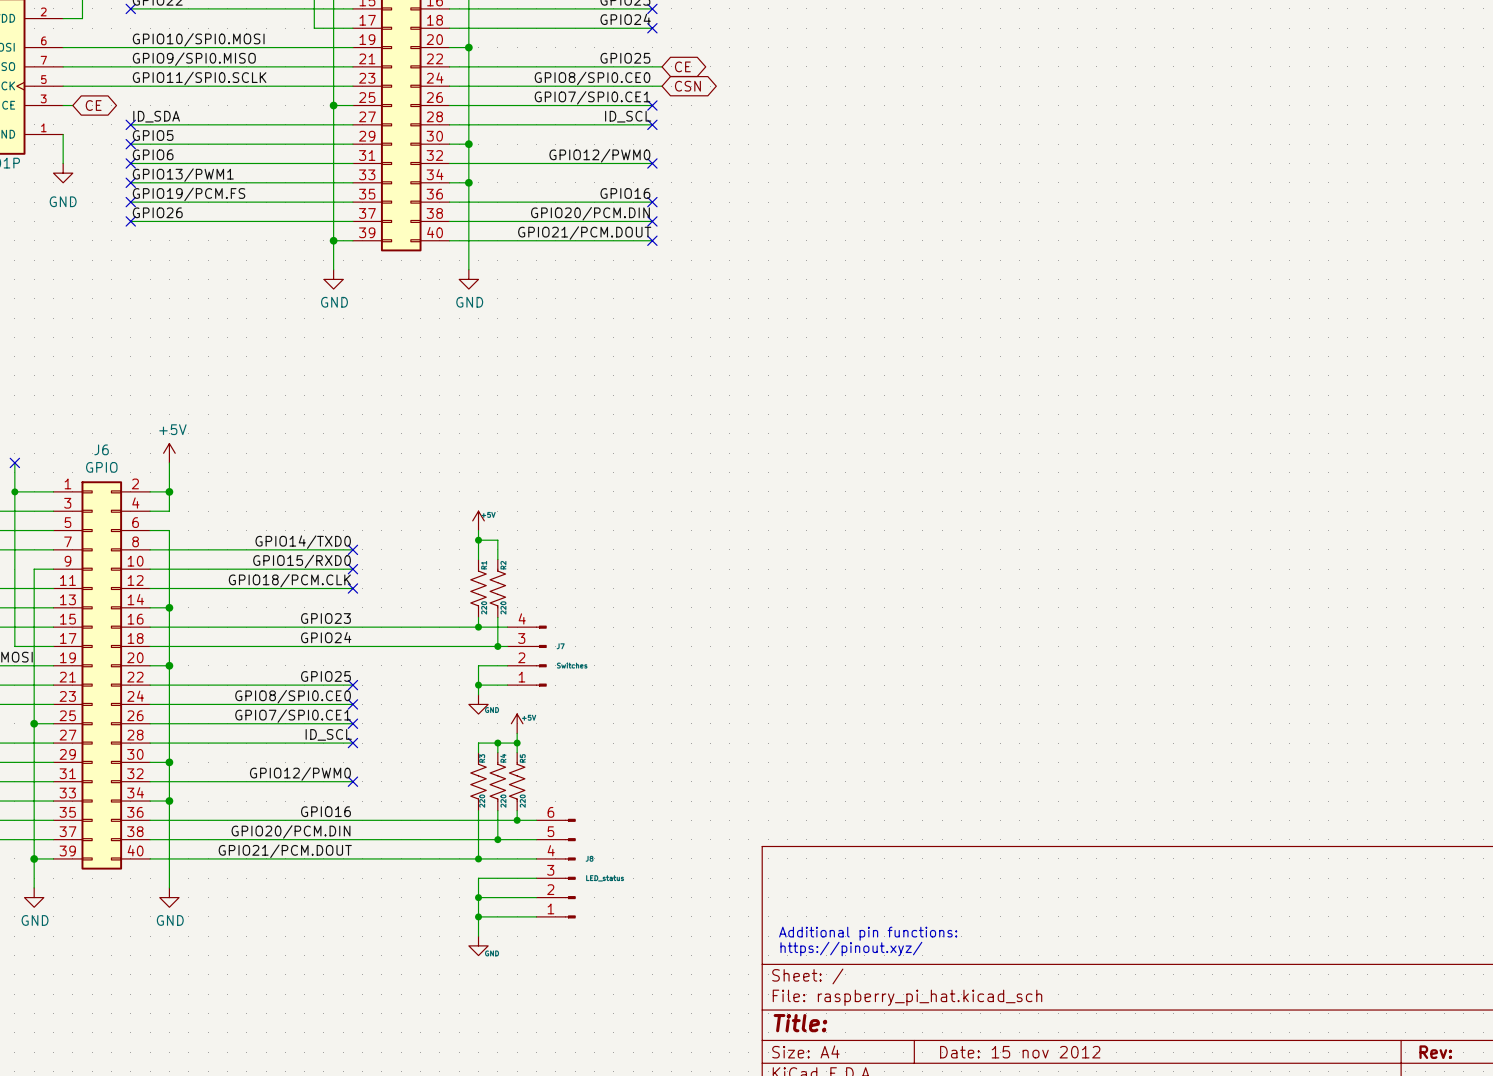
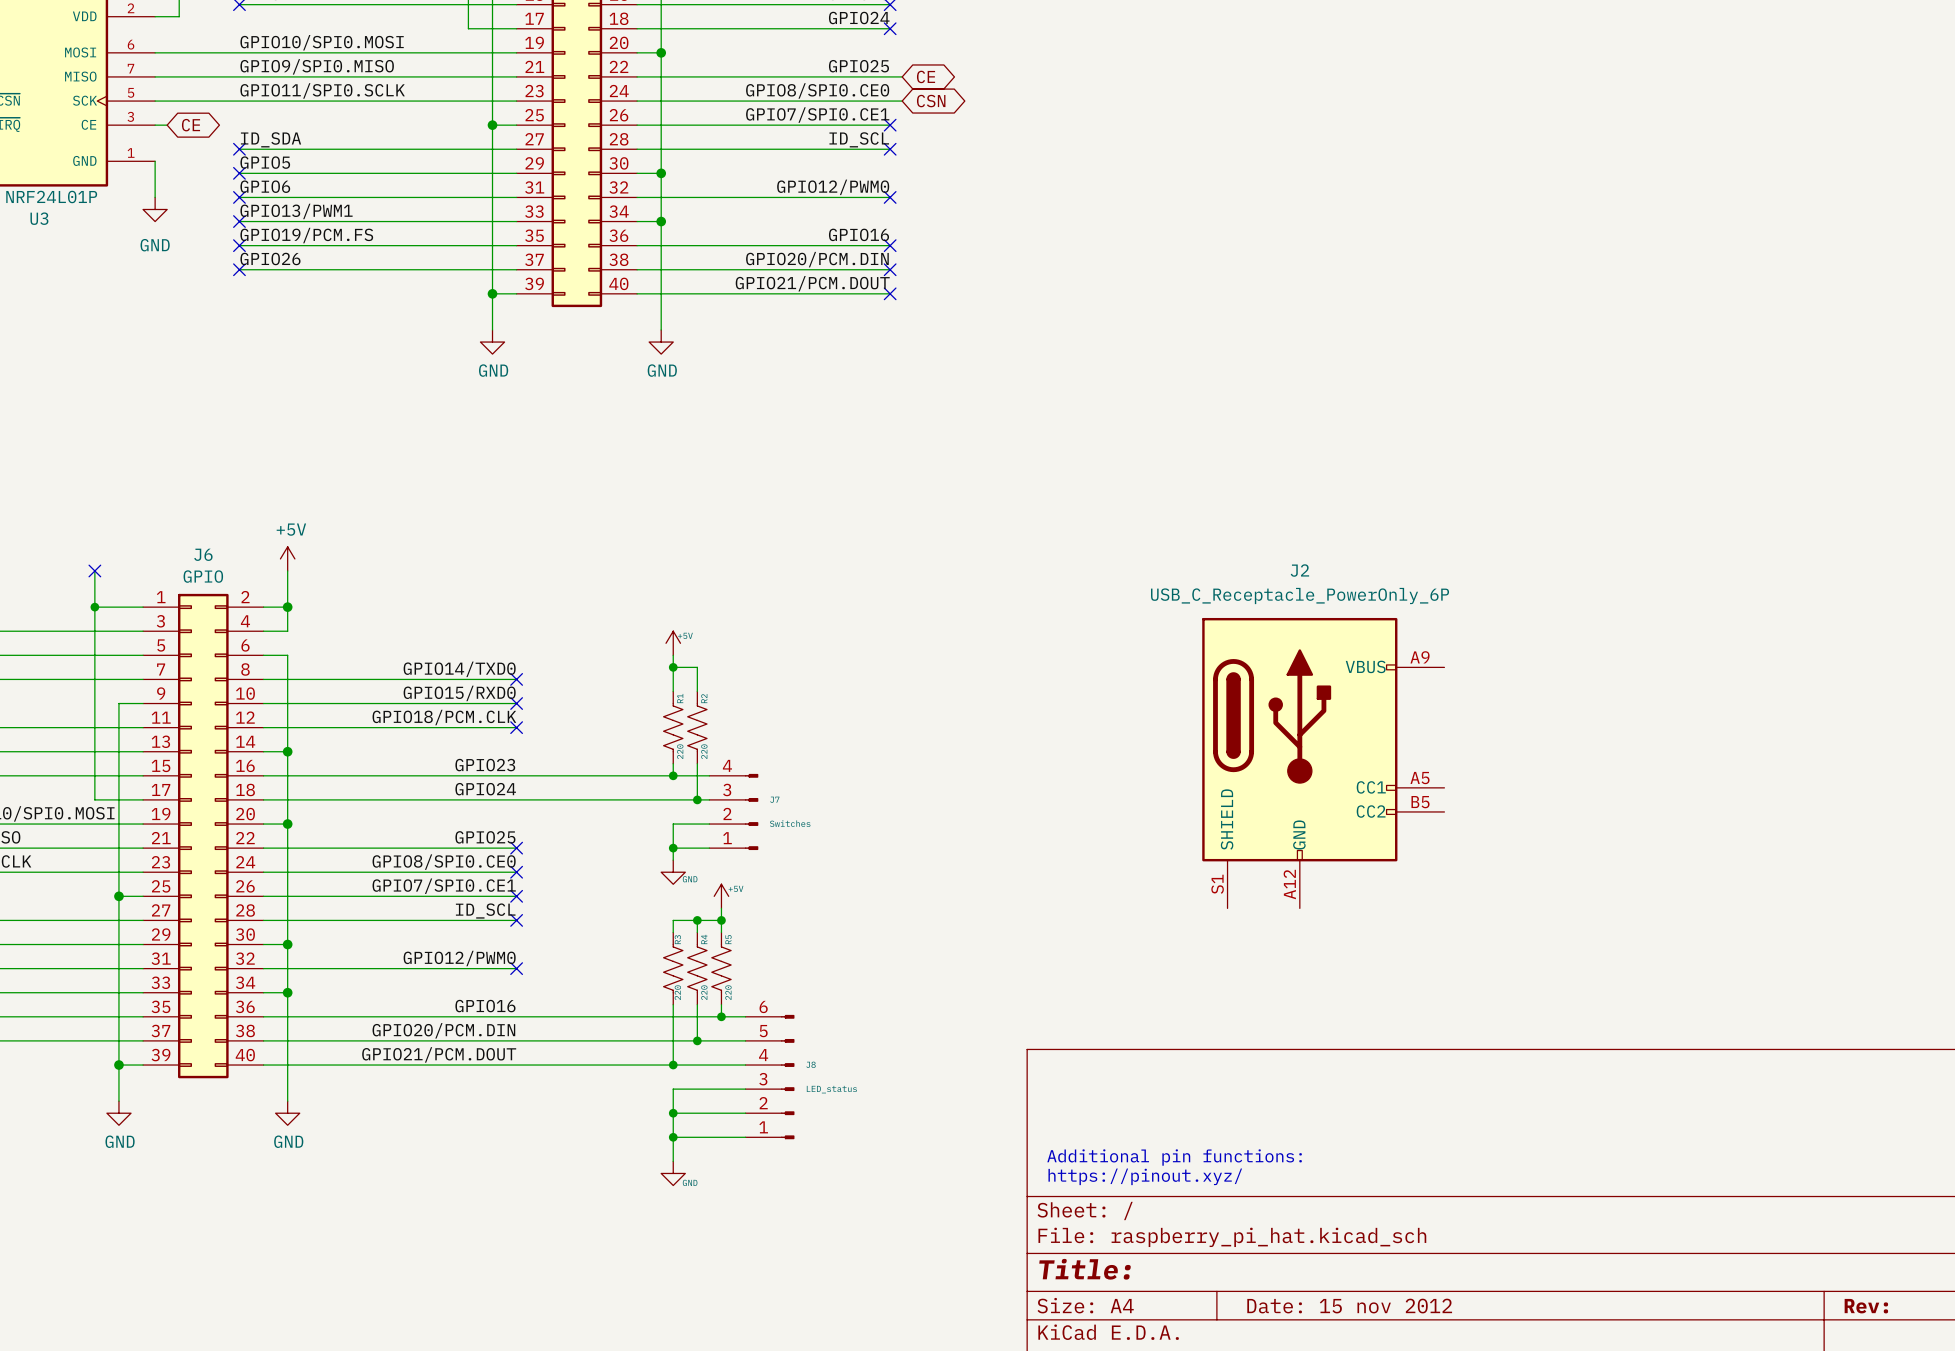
J2: none -> USB_C_Receptacle_PowerOnly_6P (1323, 763)

